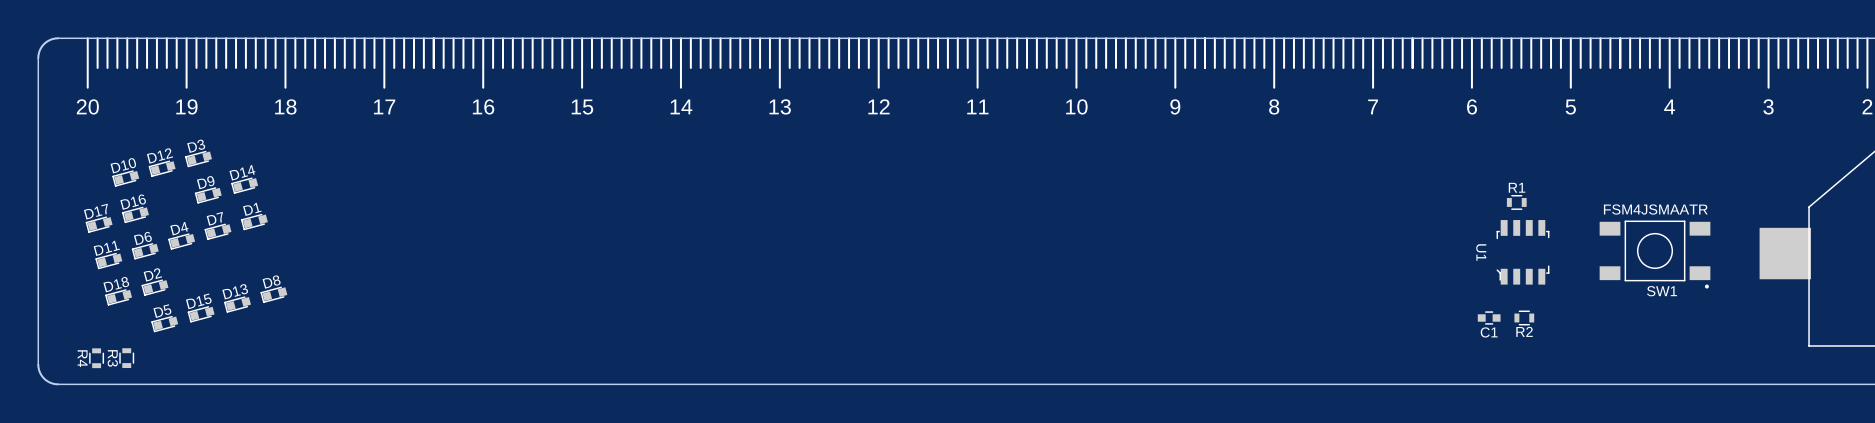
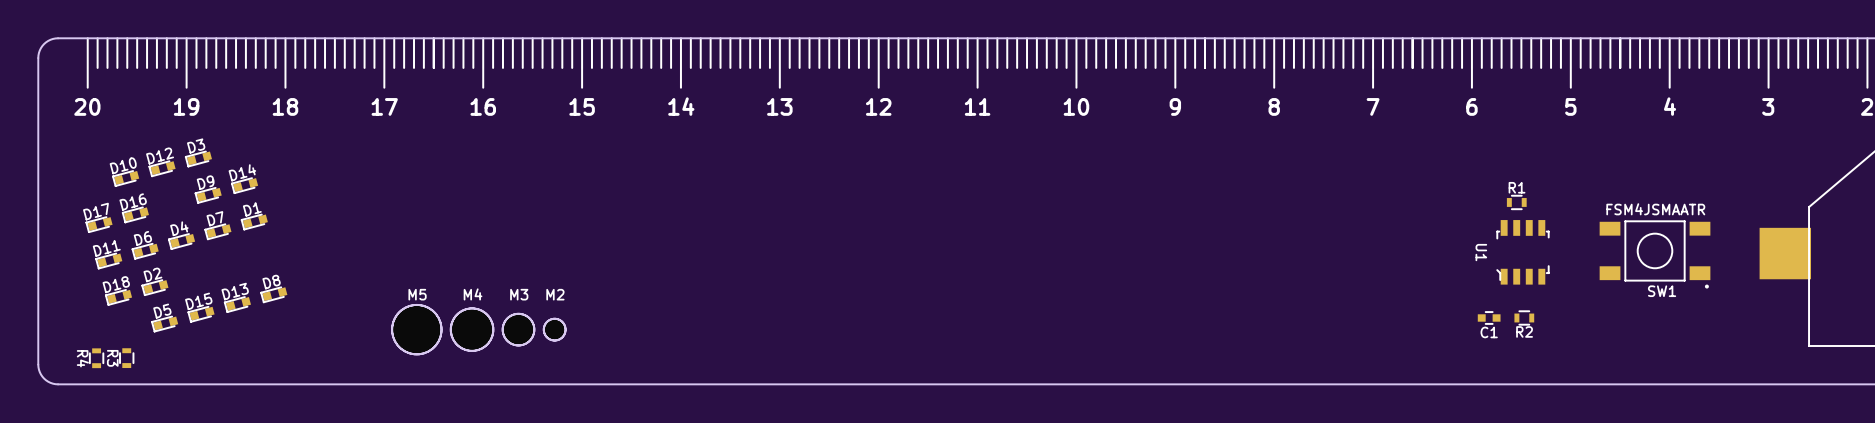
M5: none -> (416, 329)
part: none -> (416, 329)
M4: none -> (472, 329)
part: none -> (472, 329)
M3: none -> (518, 329)
part: none -> (518, 329)
M2: none -> (554, 329)
part: none -> (554, 329)

